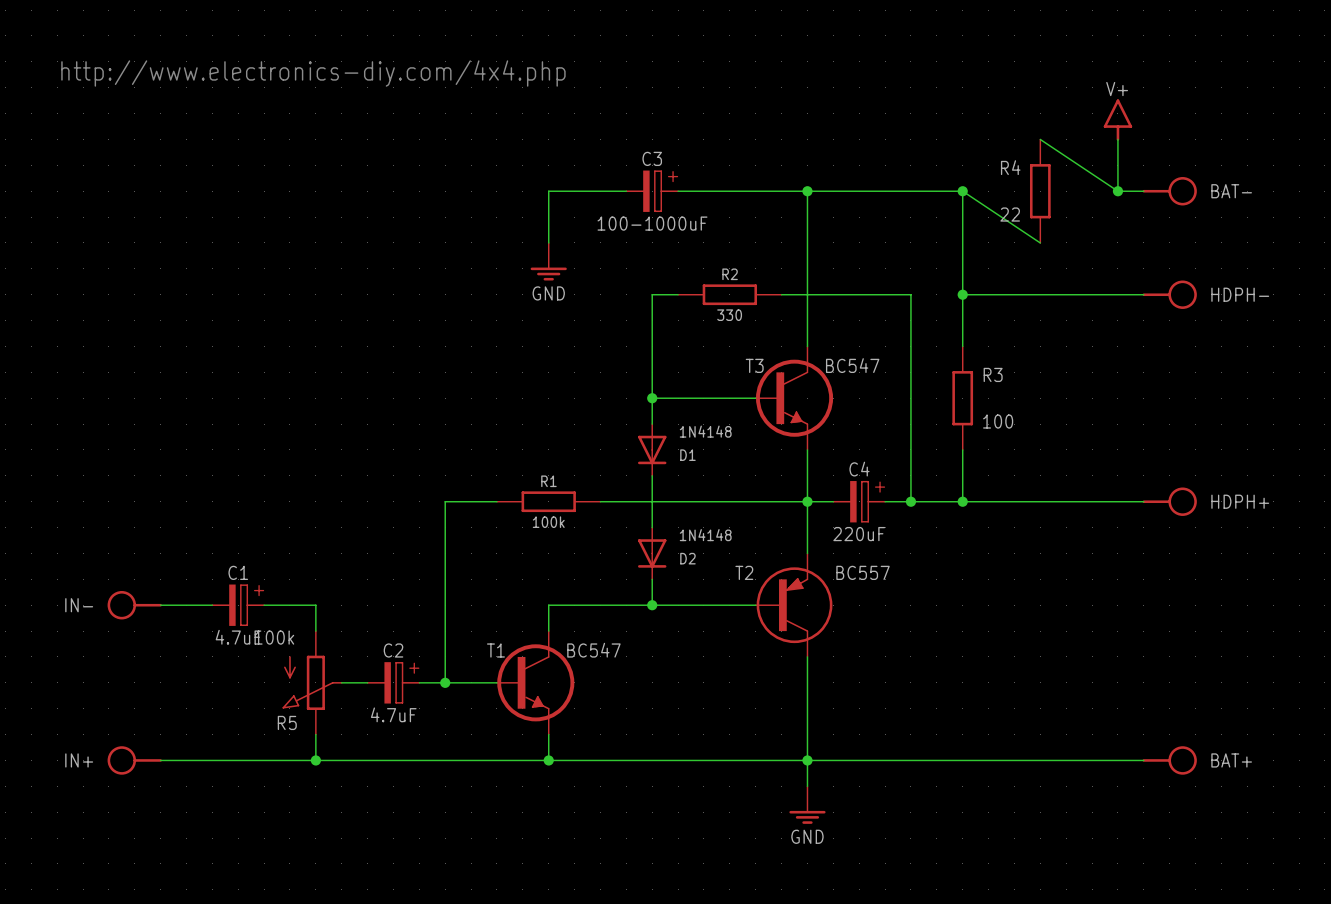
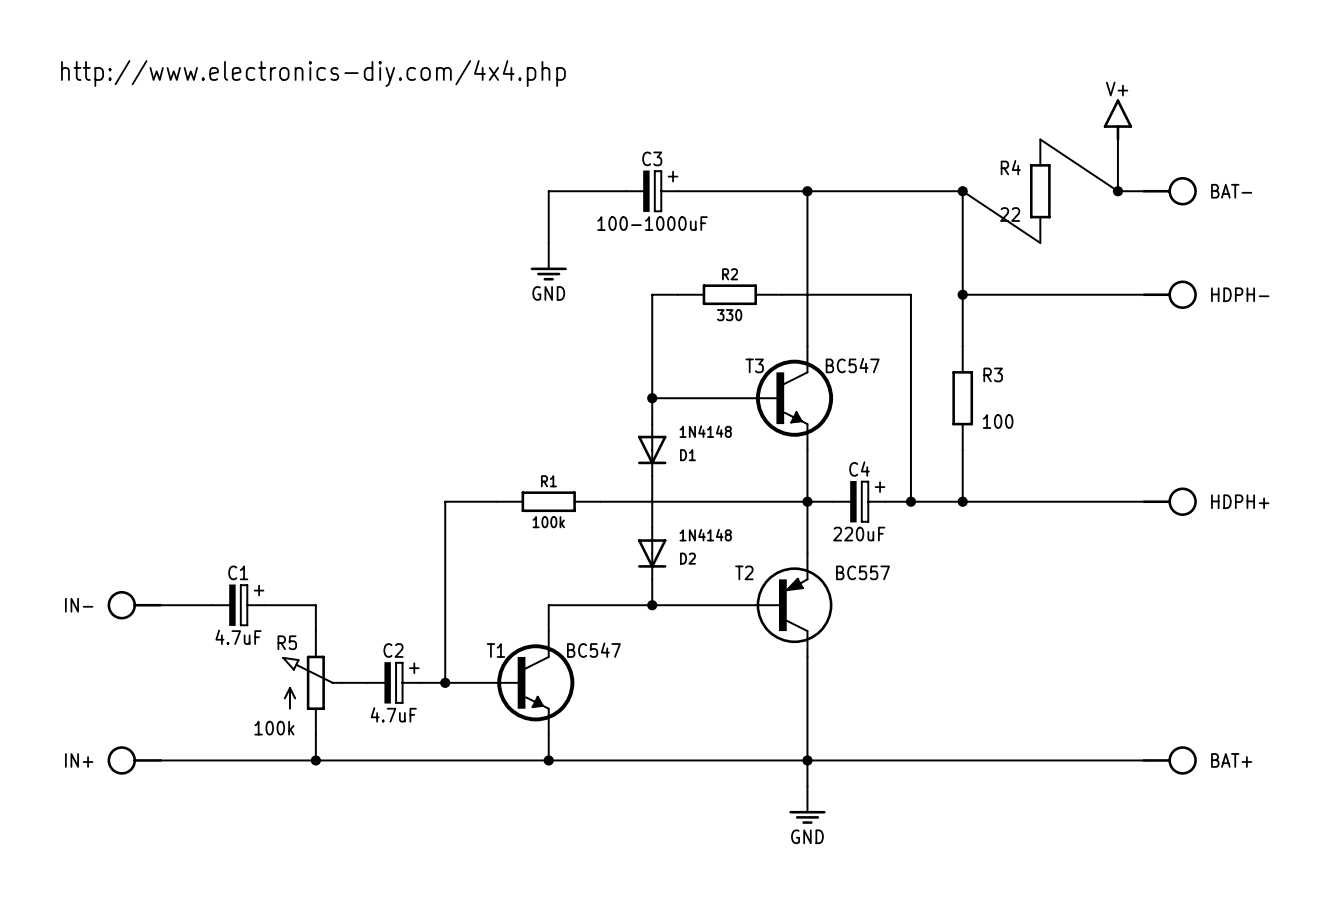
R5 flip: as is (312, 682) -> up-down (312, 682)

